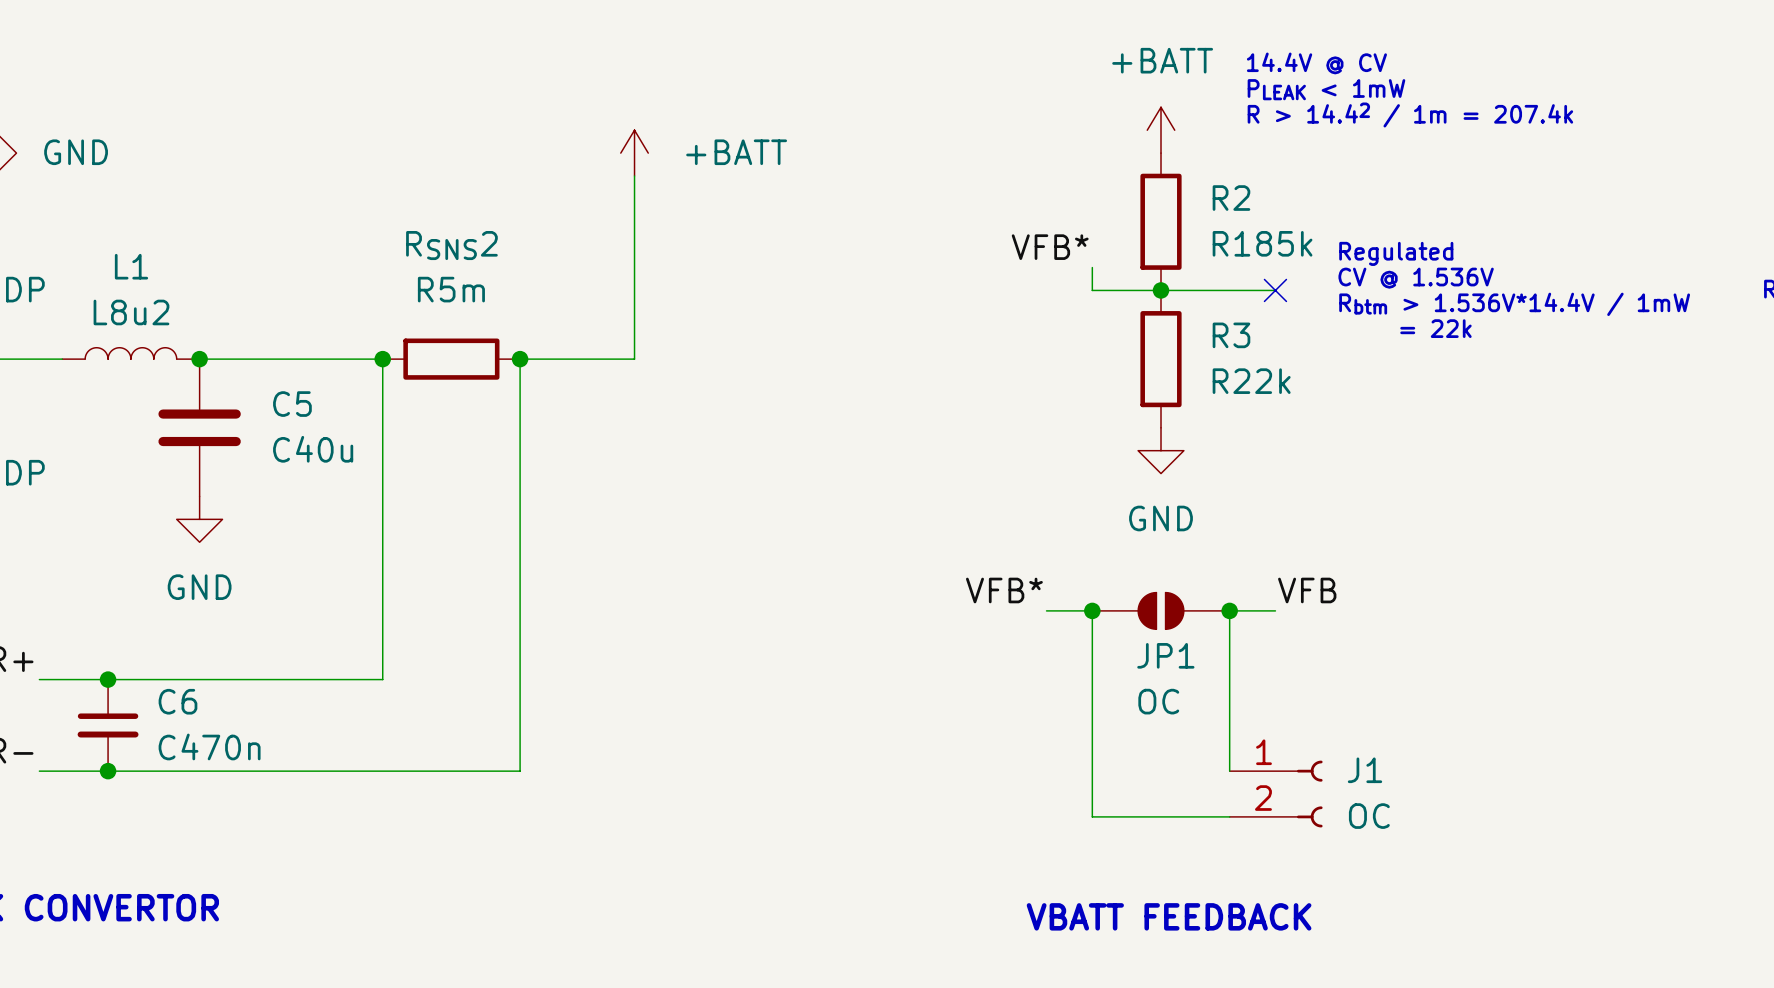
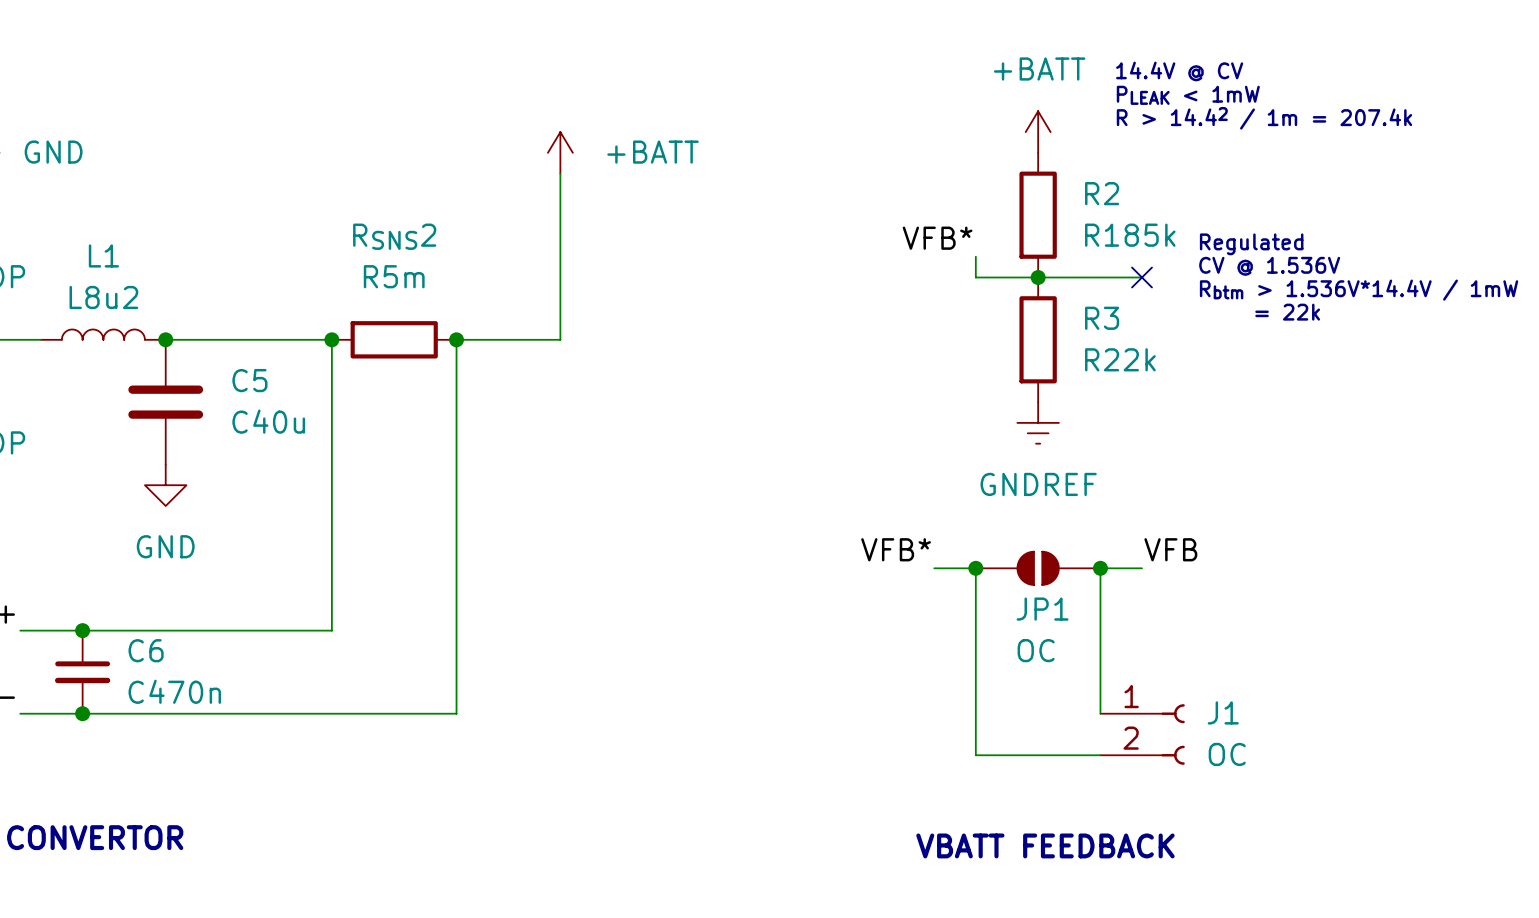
power symbol: GND (1161, 450) -> GNDREF (1038, 422)

